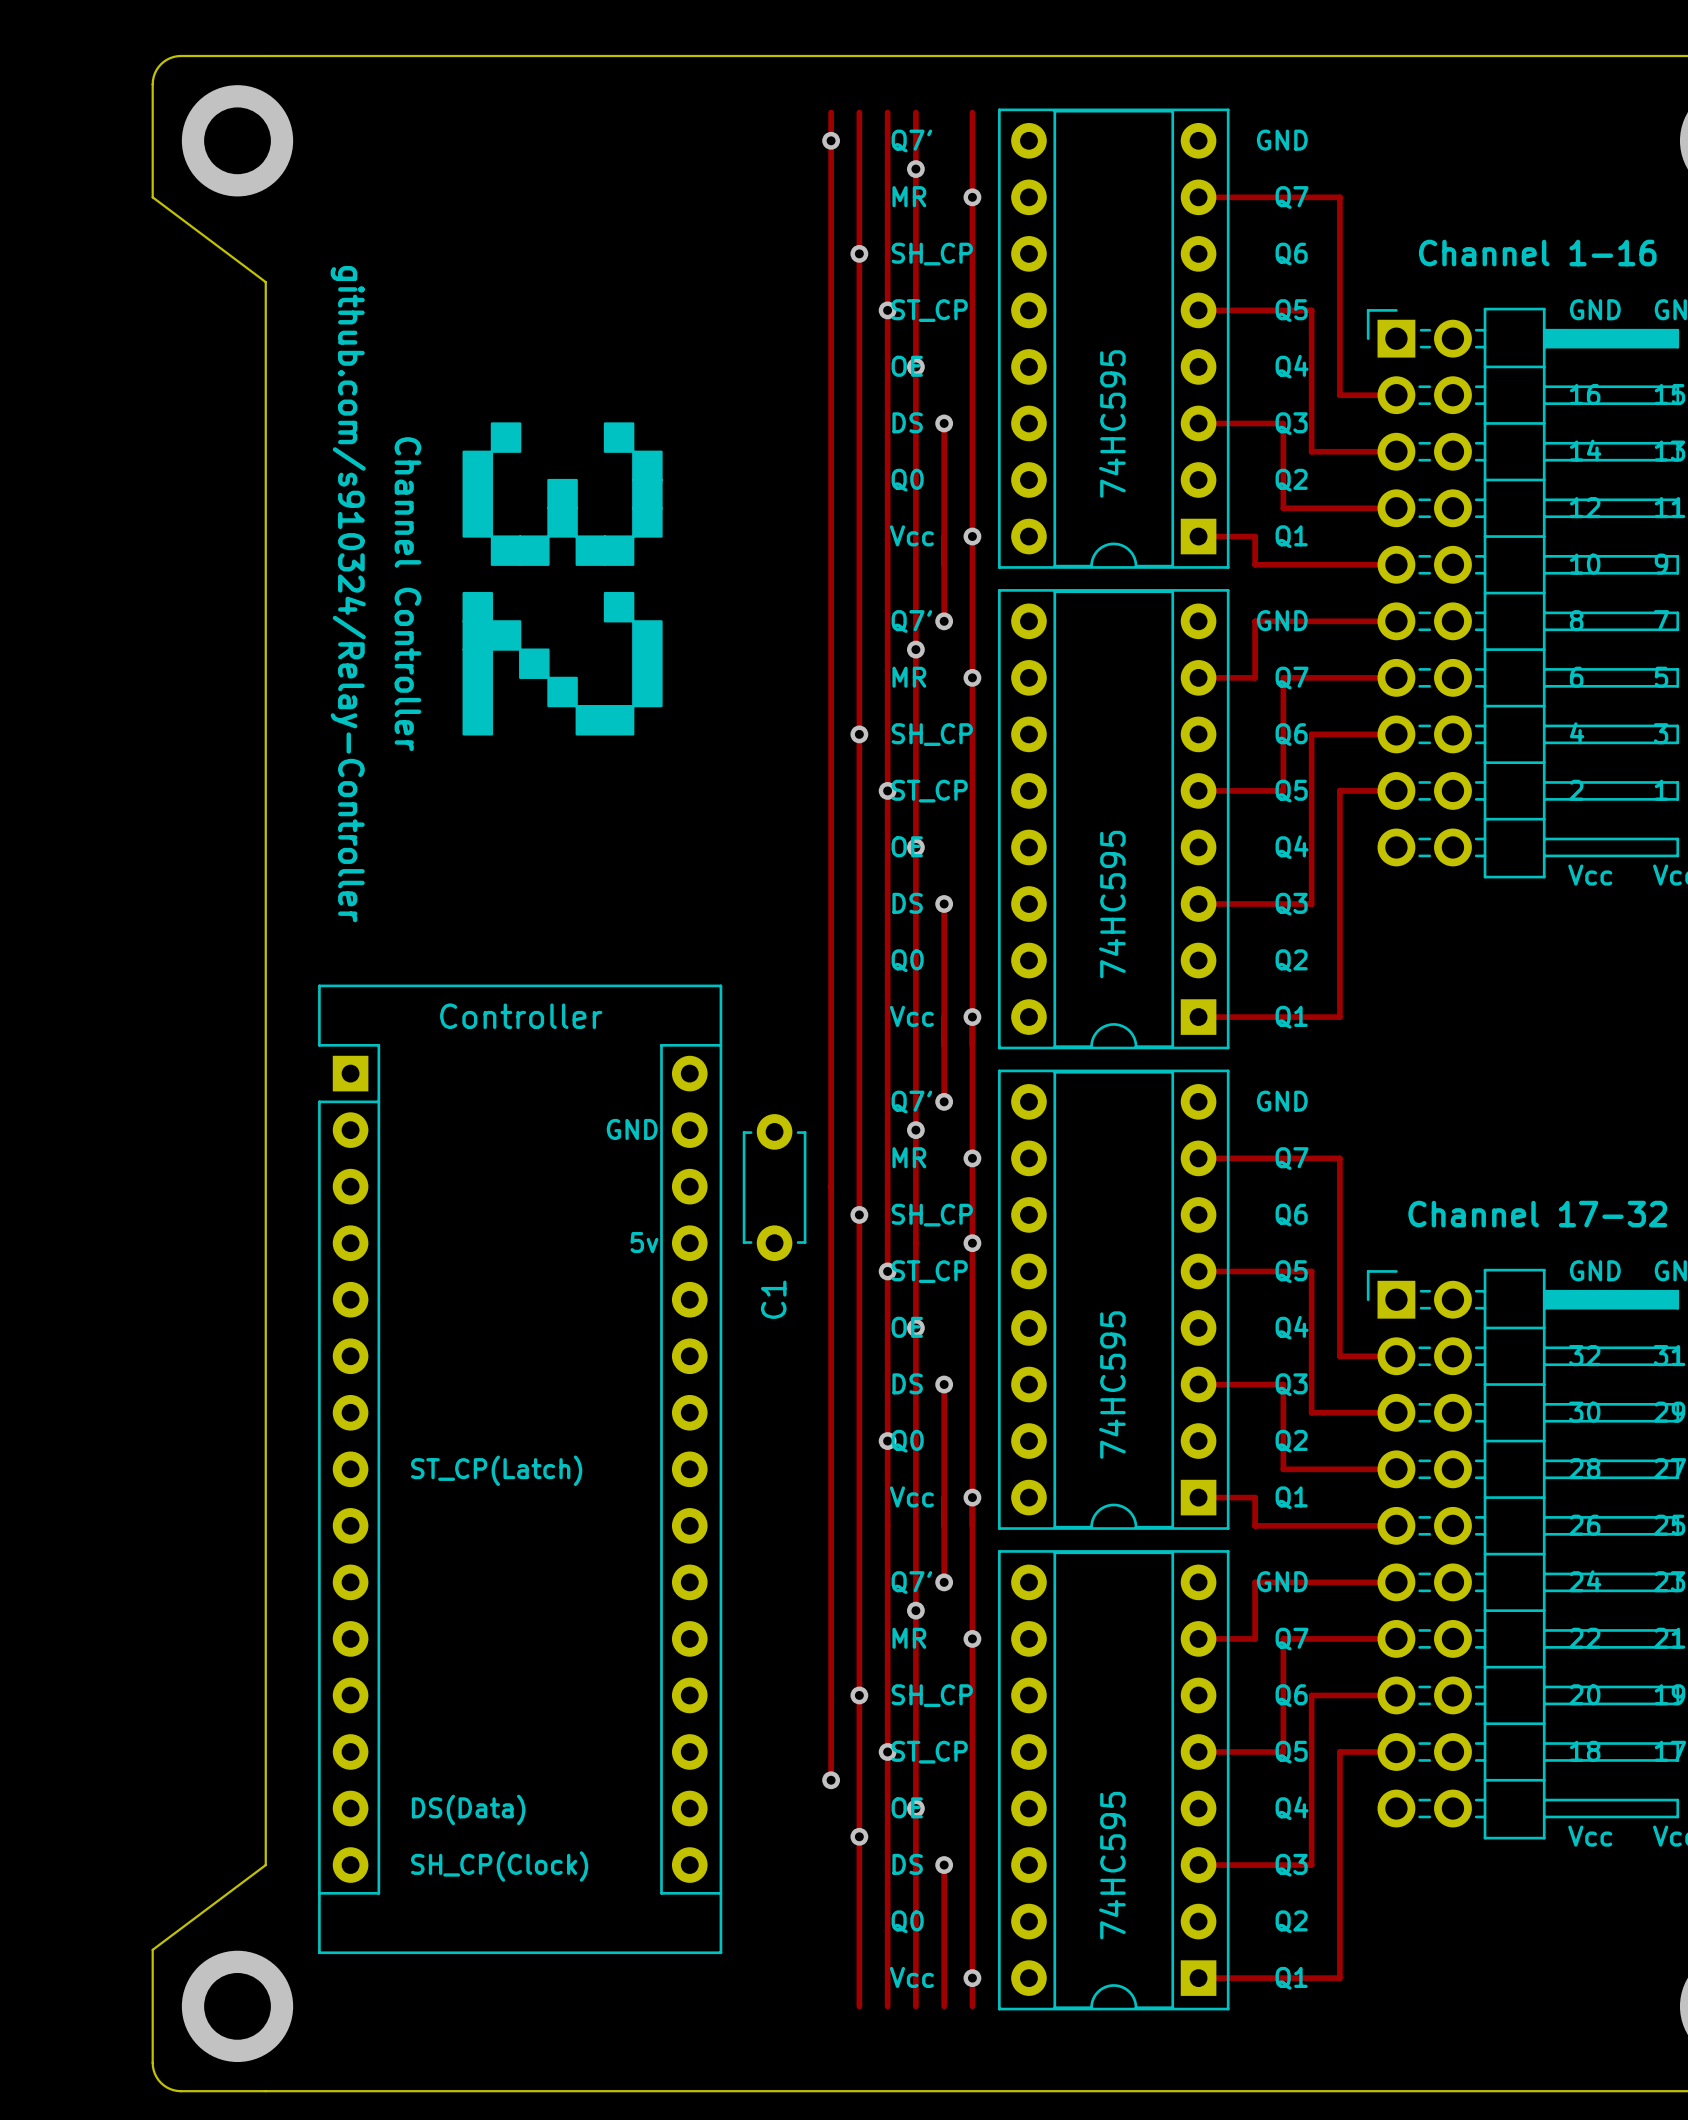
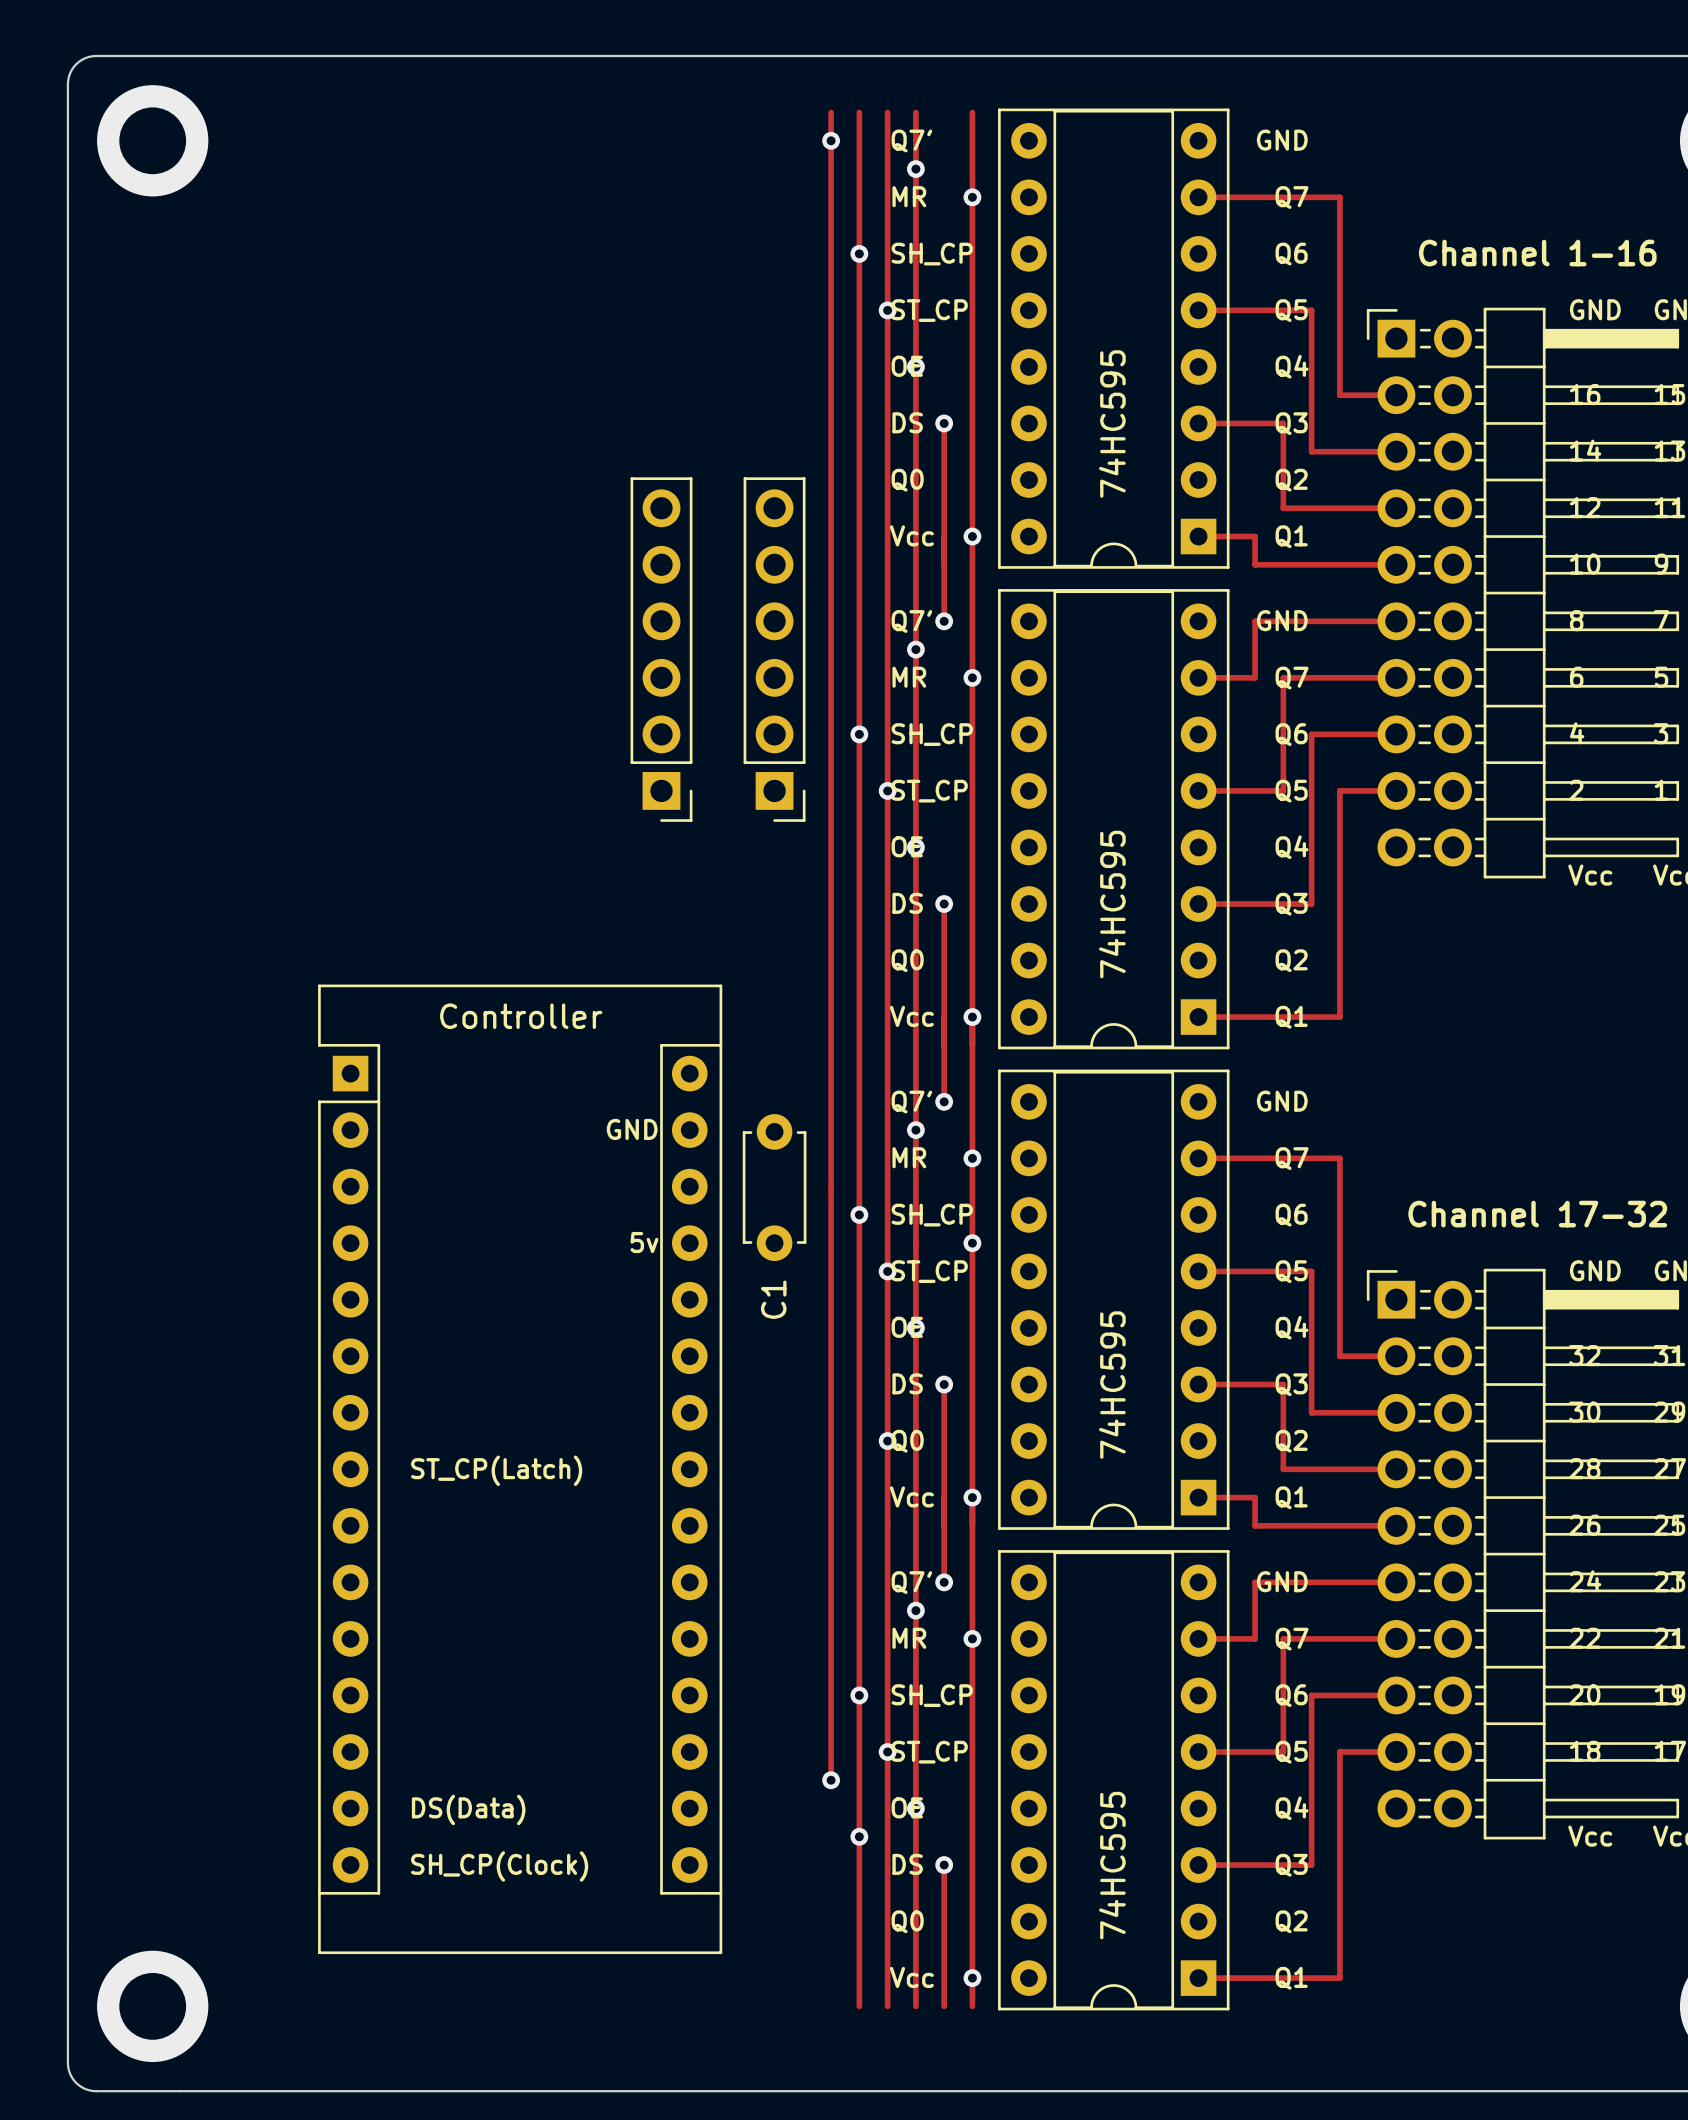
board edge: (180, 56) (163, 61) (153, 76) (152, 197) (265, 282) (265, 1865) (152, 1949) (153, 2070) (163, 2085) (180, 2091) -> (180, 56) (88, 56) (73, 67) (67, 84) (67, 2062) (73, 2080) (88, 2090) (180, 2091)
via position: (237, 140) -> (152, 140)
drawing: [462, 422, 663, 736] -> none
text: github.com/s910324/Relay-Controller (348, 594) -> none
text: Channel Controller (407, 594) -> none
part: none -> (661, 649)
part: none -> (774, 649)
via position: (237, 2006) -> (152, 2006)

